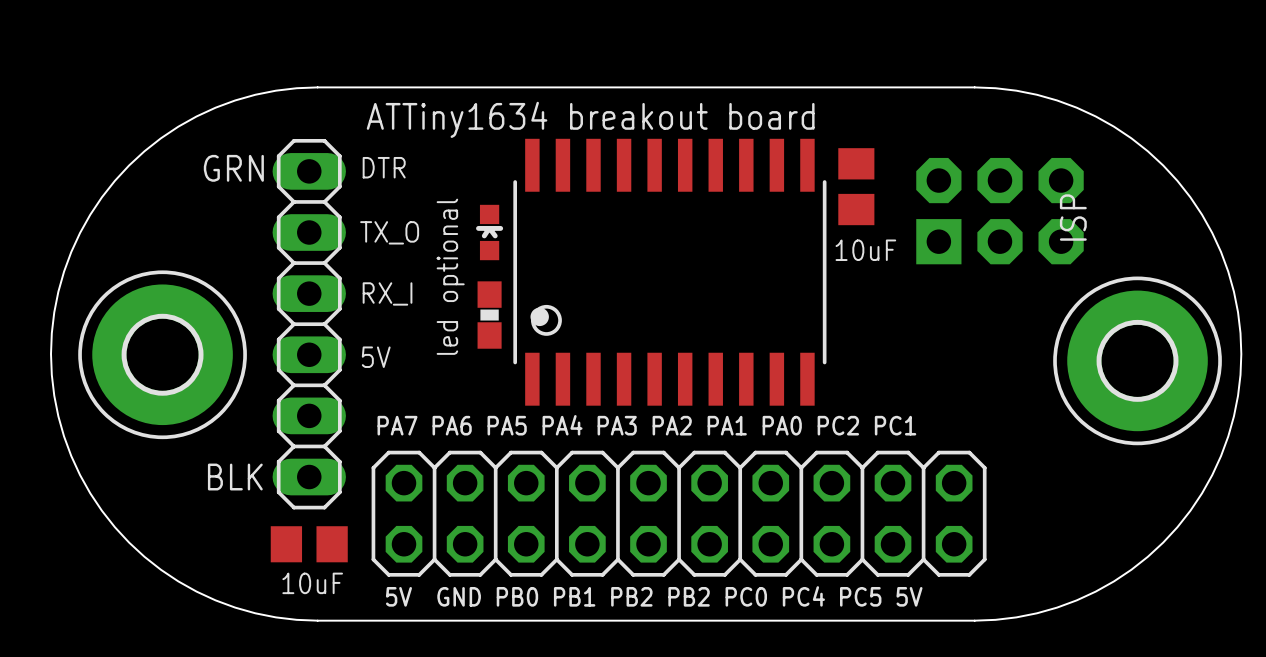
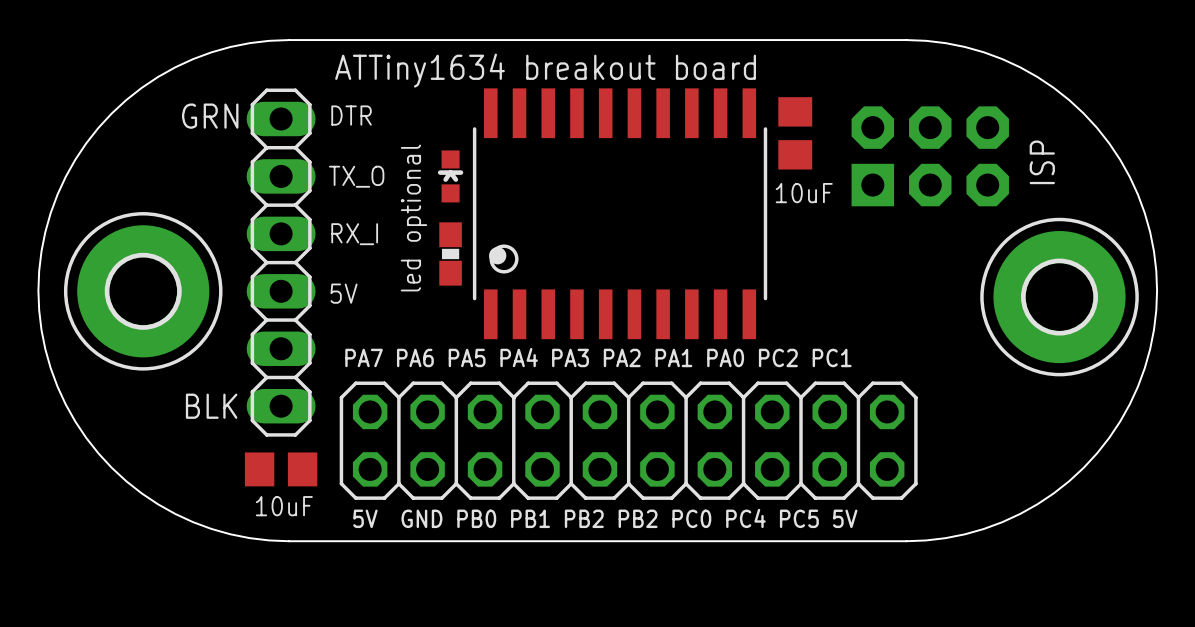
text position: ISP (1073, 217) -> ISP (1042, 162)

